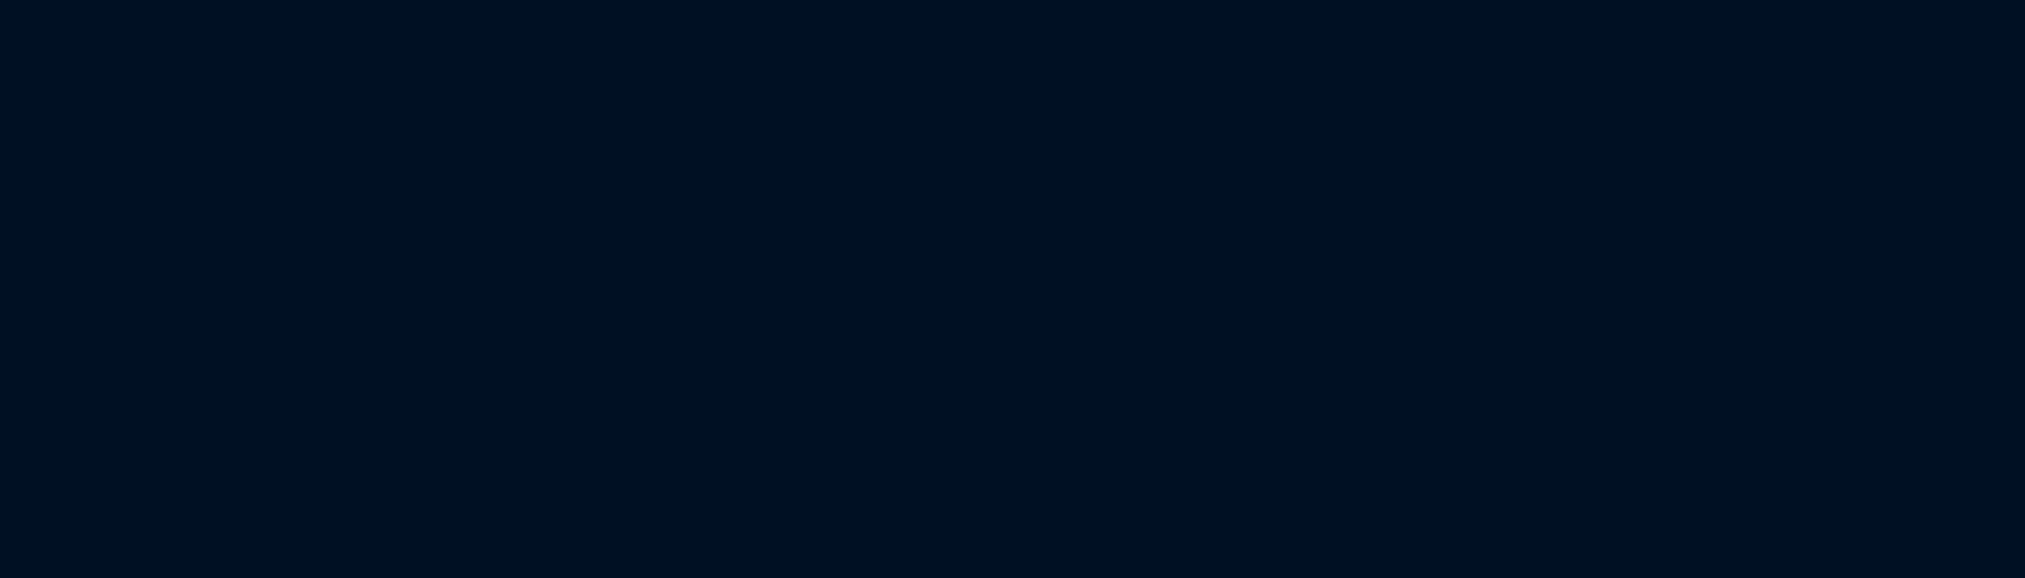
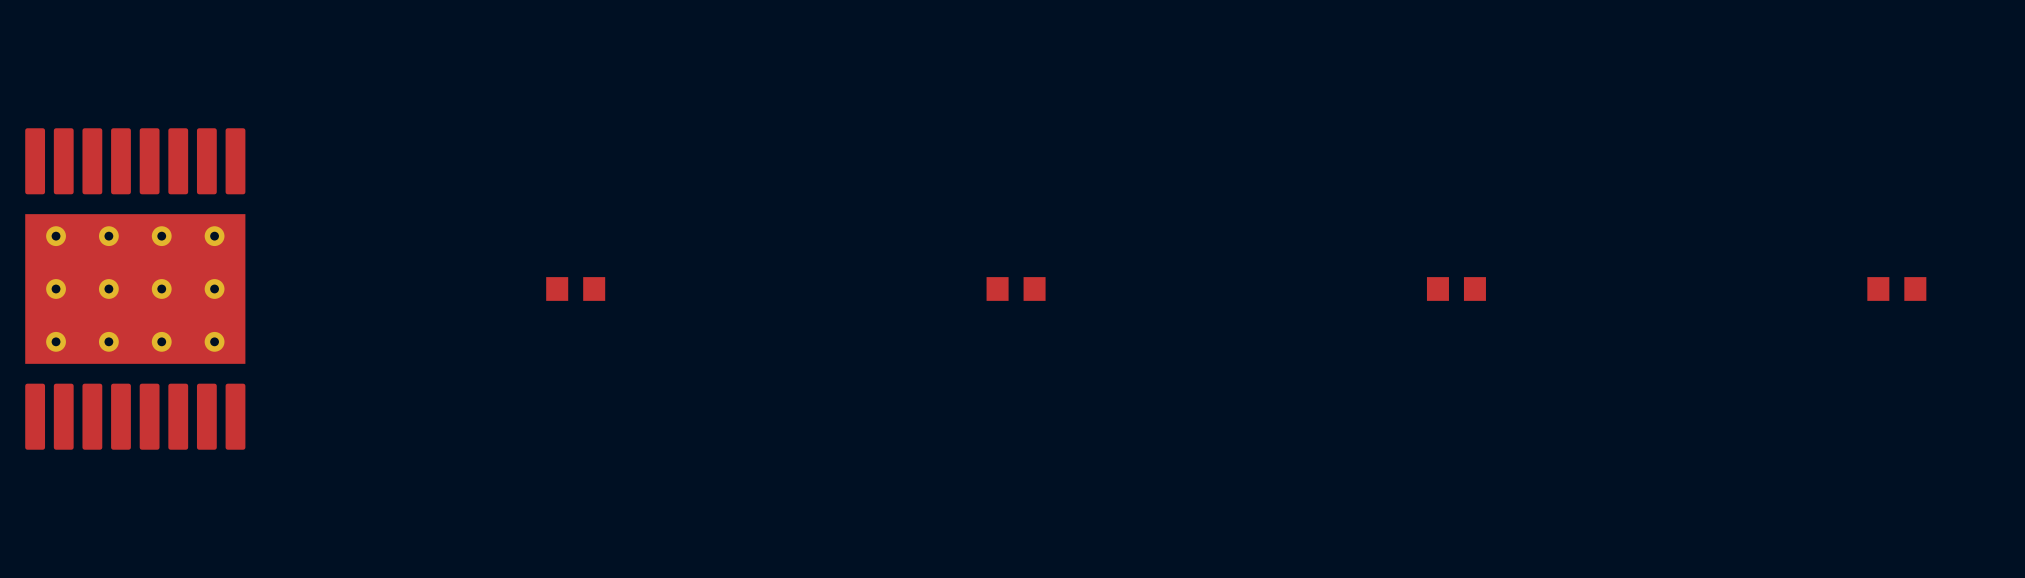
part: none -> (135, 288)
part: none -> (575, 288)
part: none -> (1016, 288)
part: none -> (1456, 288)
part: none -> (1896, 288)

